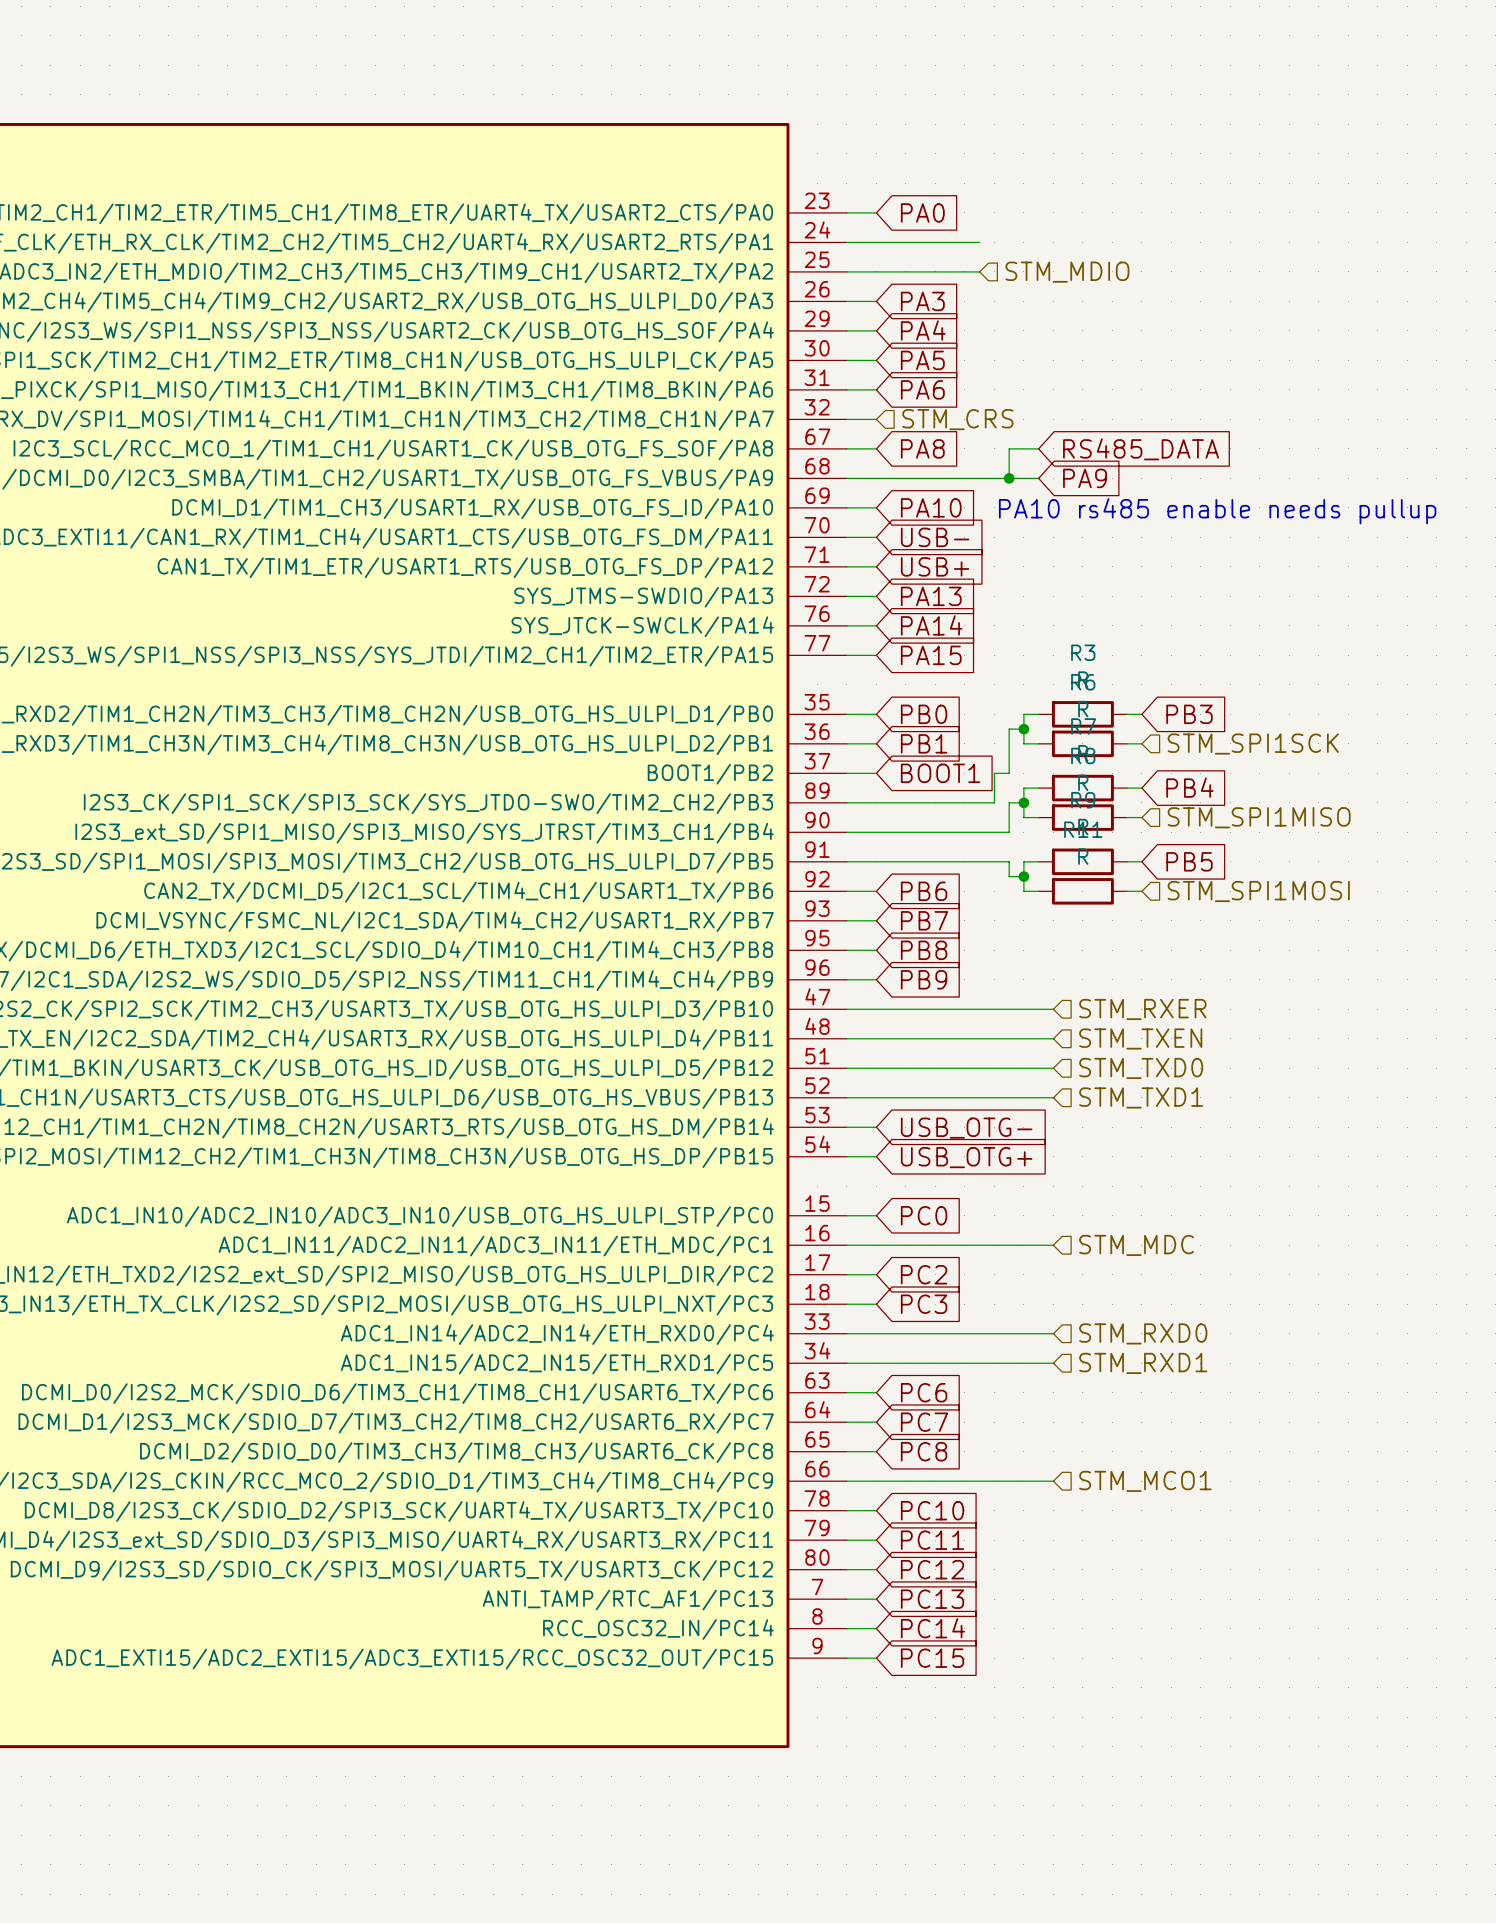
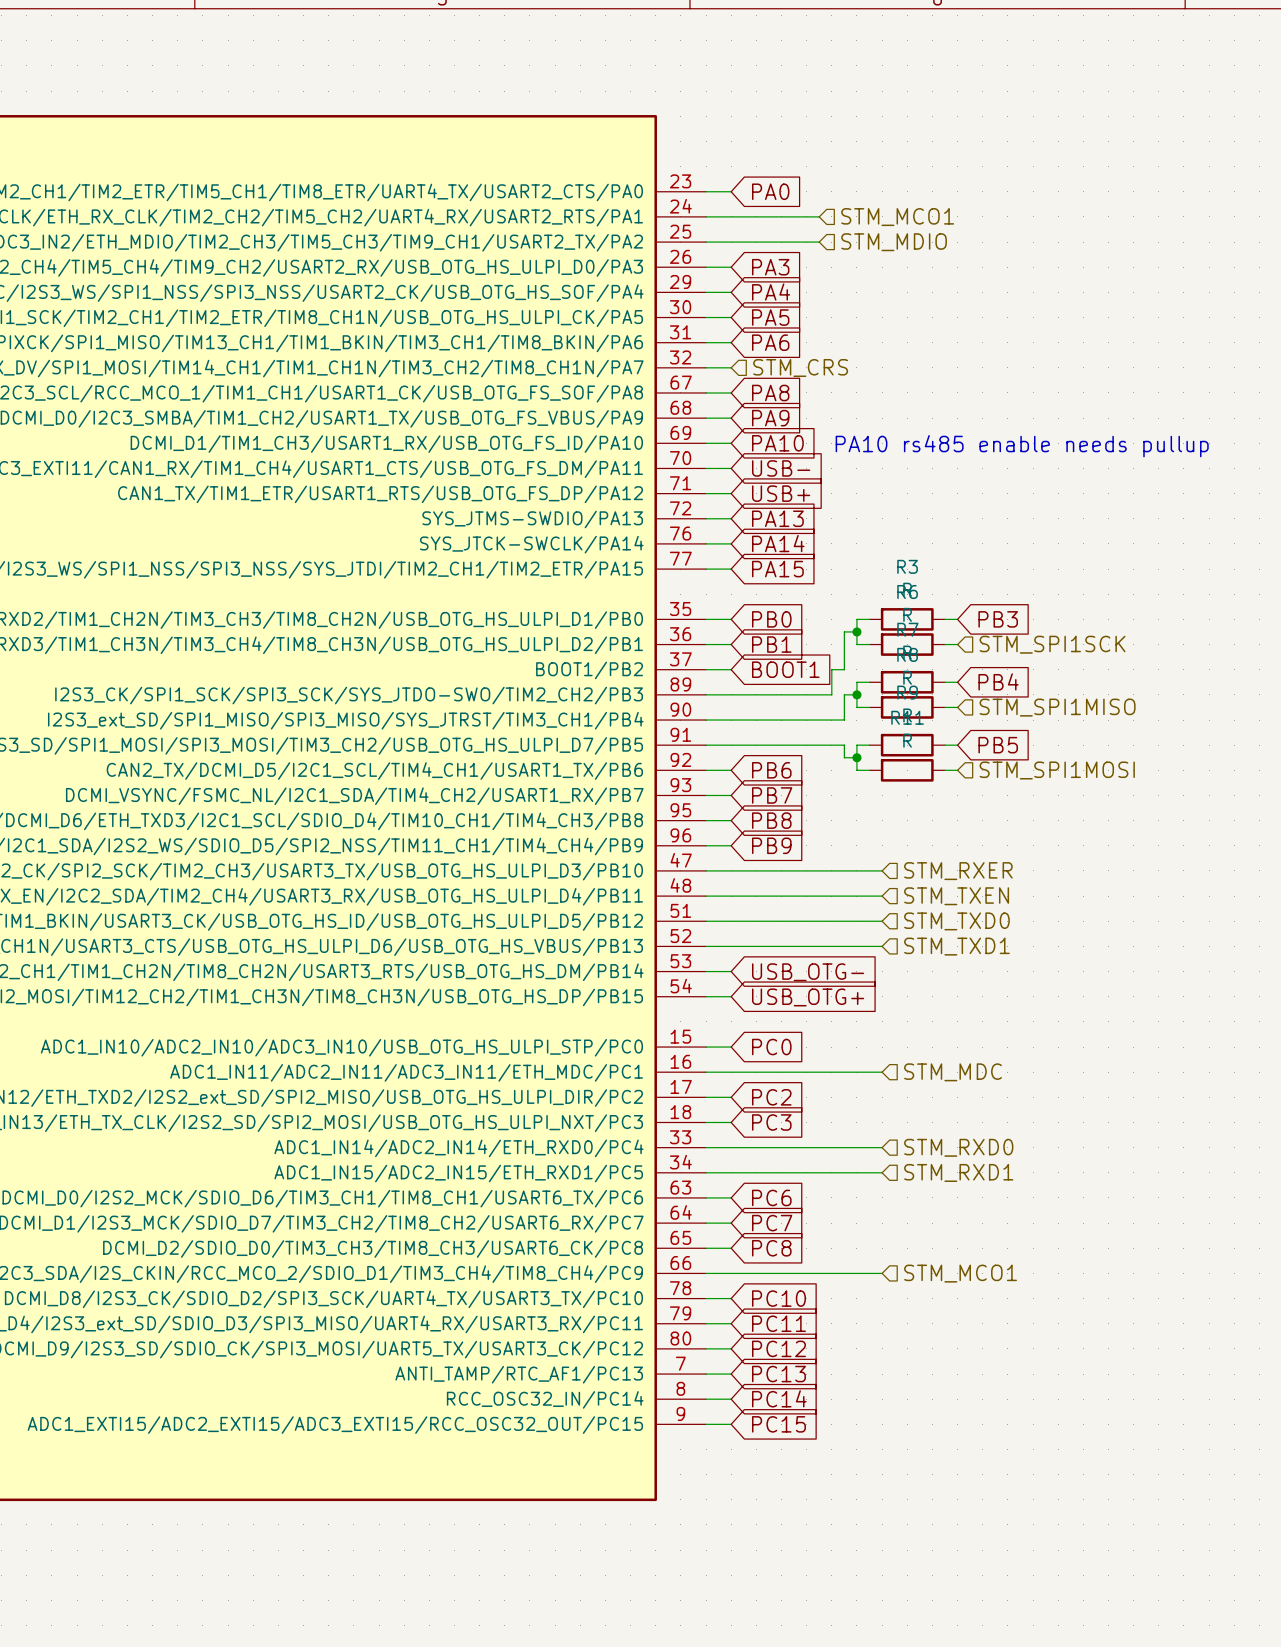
hierarchical label: none -> STM_MCO1 (897, 217)
wire: (1038, 448) (1009, 448) (1009, 478) -> none
global label: RS485_DATA (1141, 449) -> none
wire: (876, 478) (1038, 478) -> none
junction: (1009, 478) -> none
global label position: PA9 (1085, 478) -> PA9 (770, 418)

